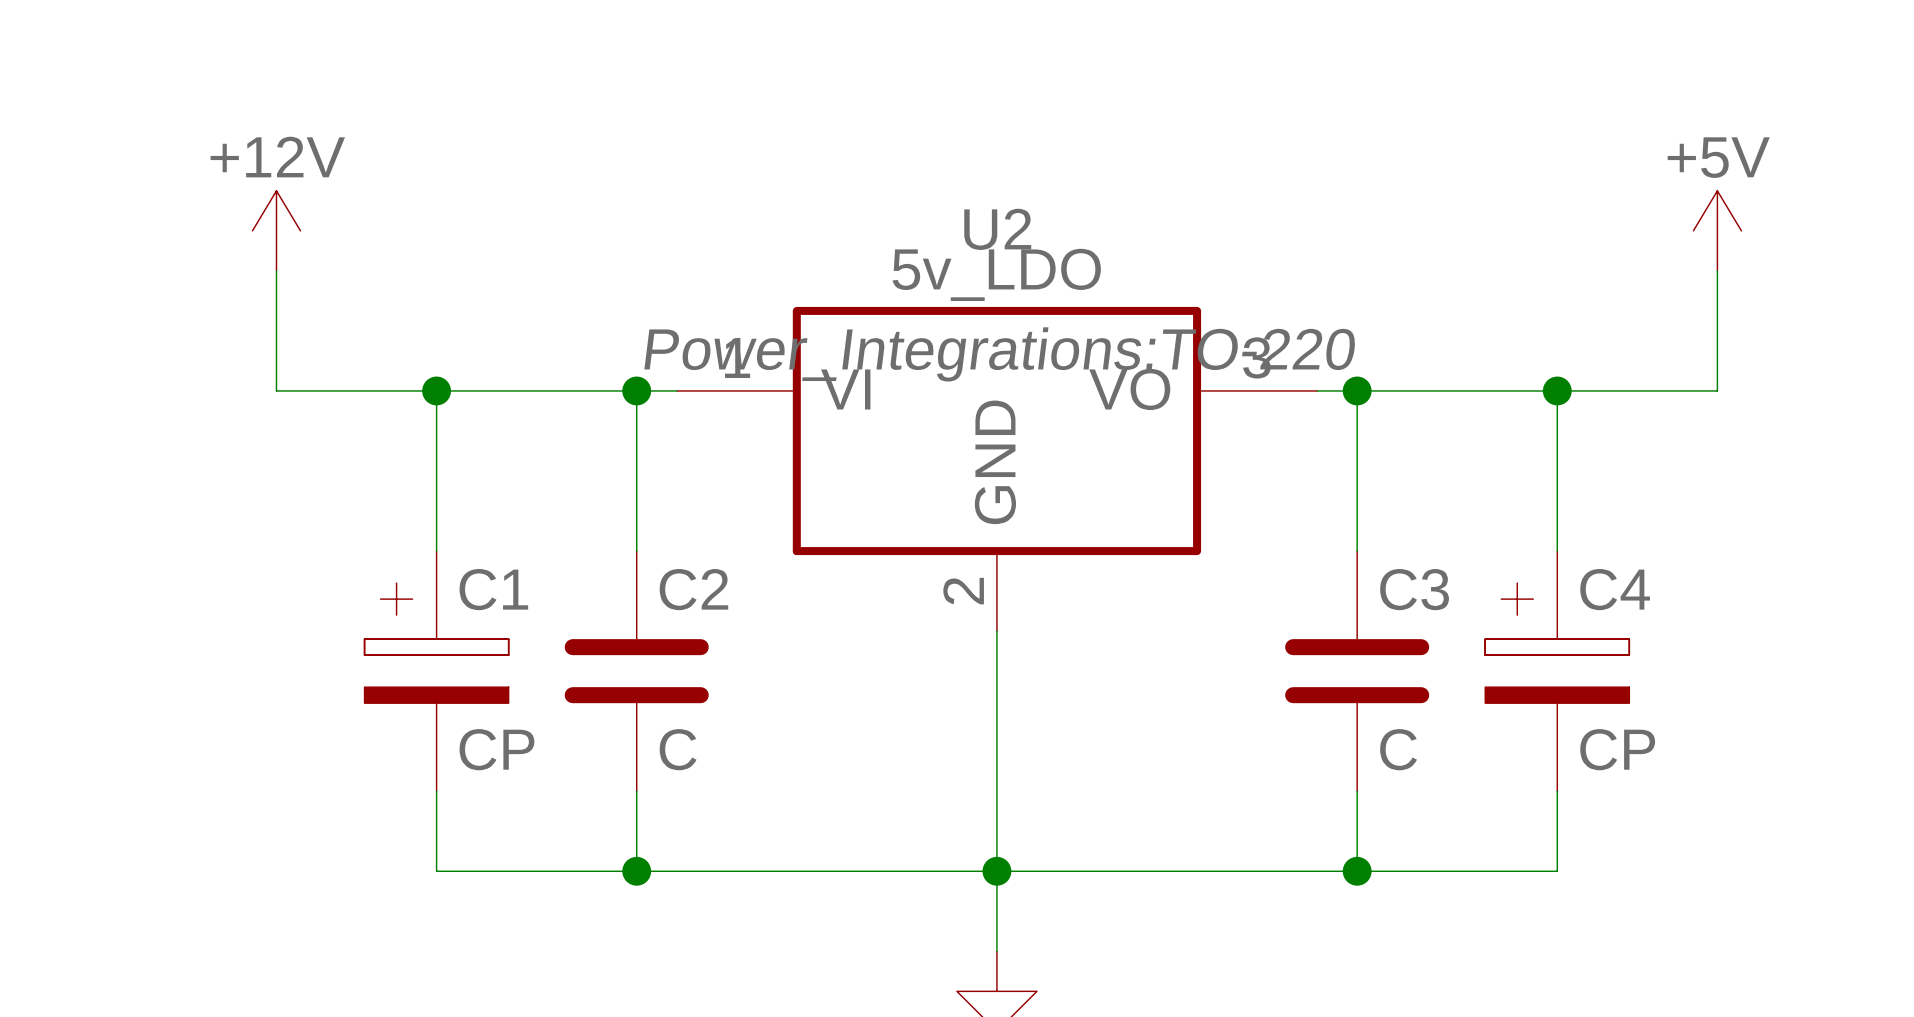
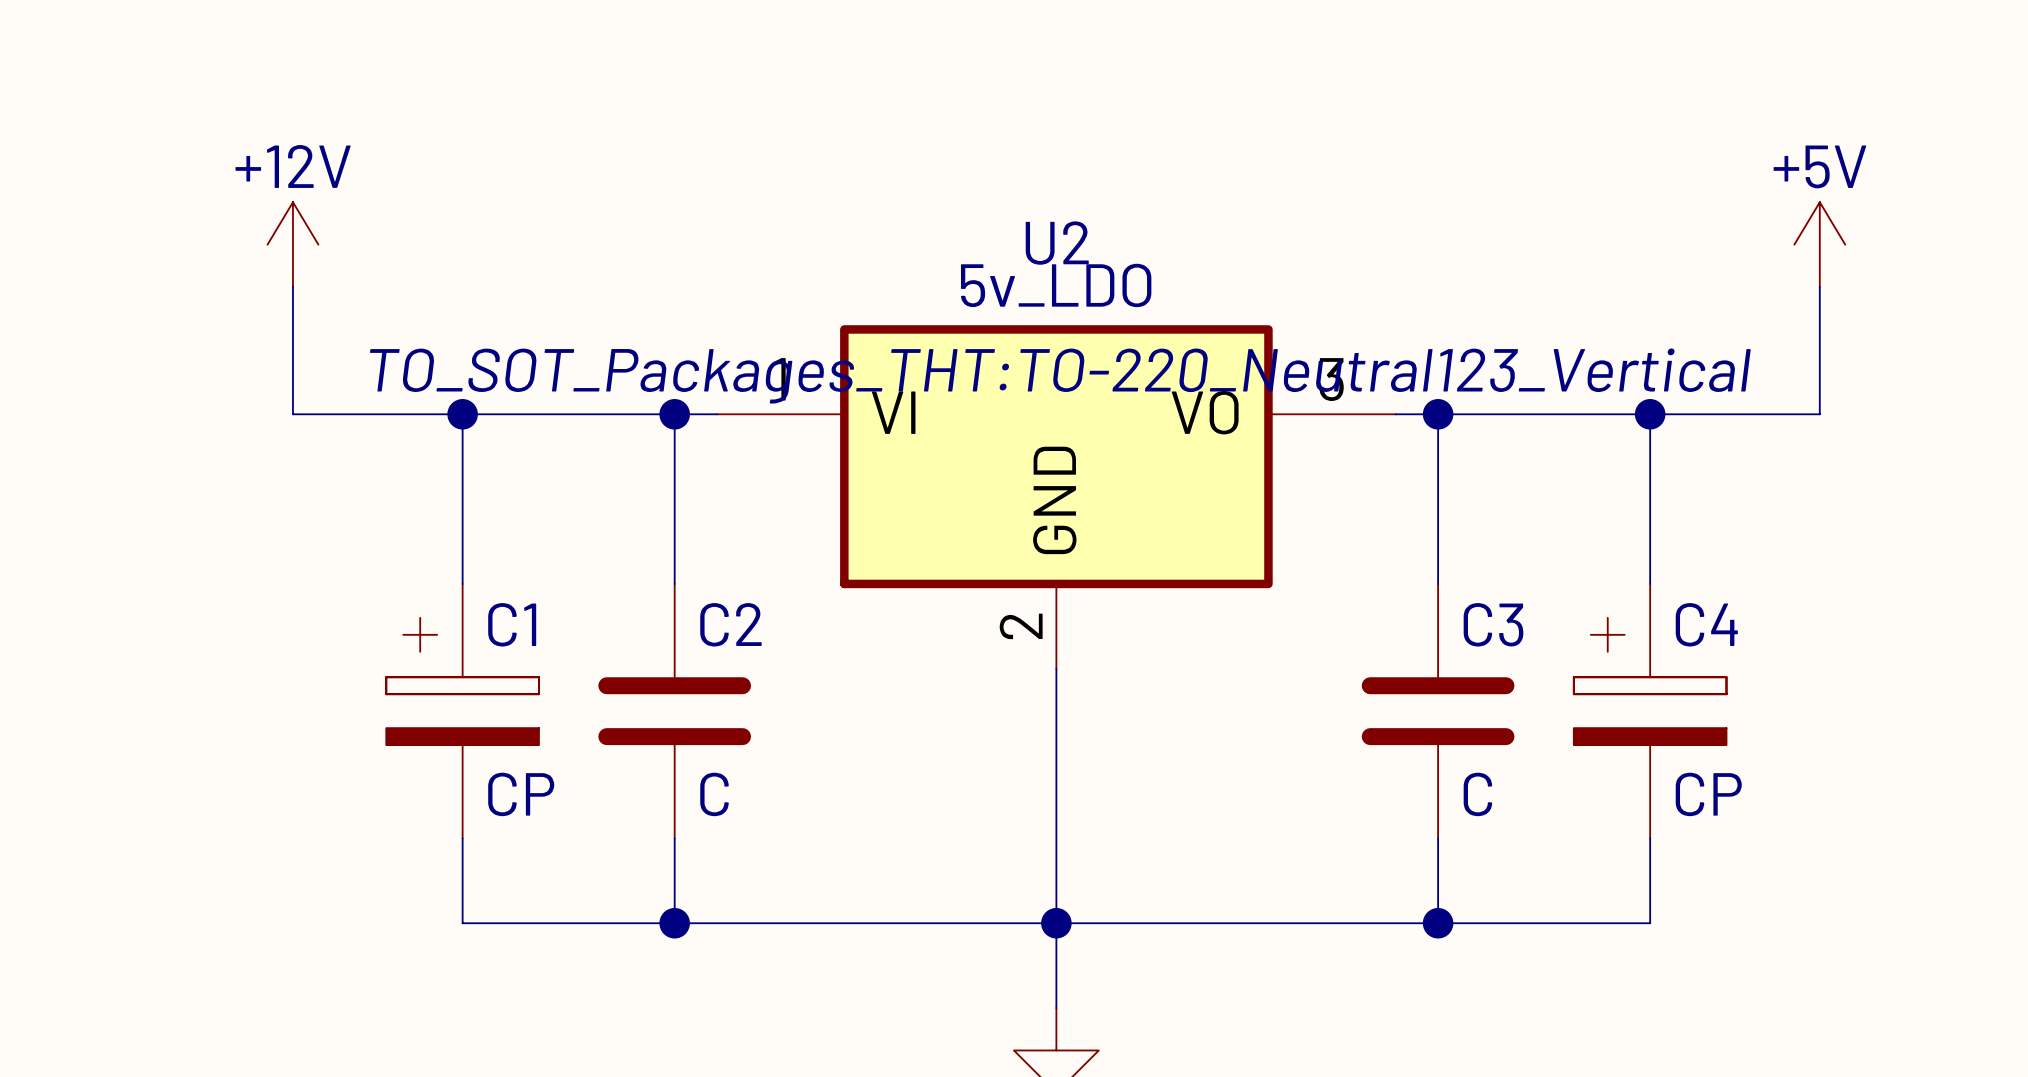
U2 text: Power_Integrations:TO-220 (1000, 354) -> TO_SOT_Packages_THT:TO-220_Neutral123_Vertical (1060, 376)

